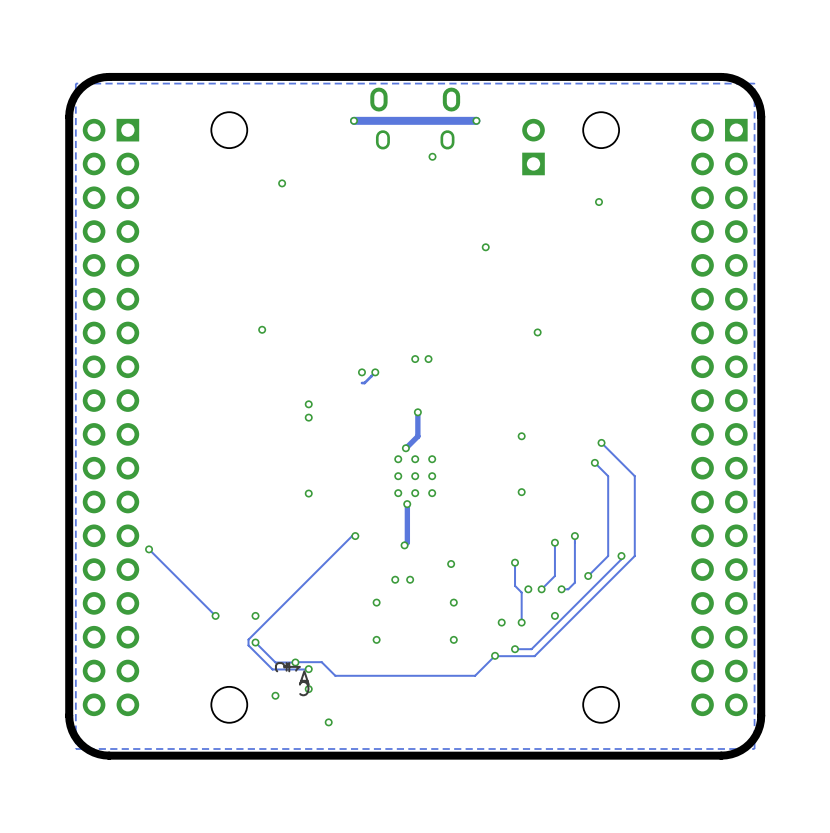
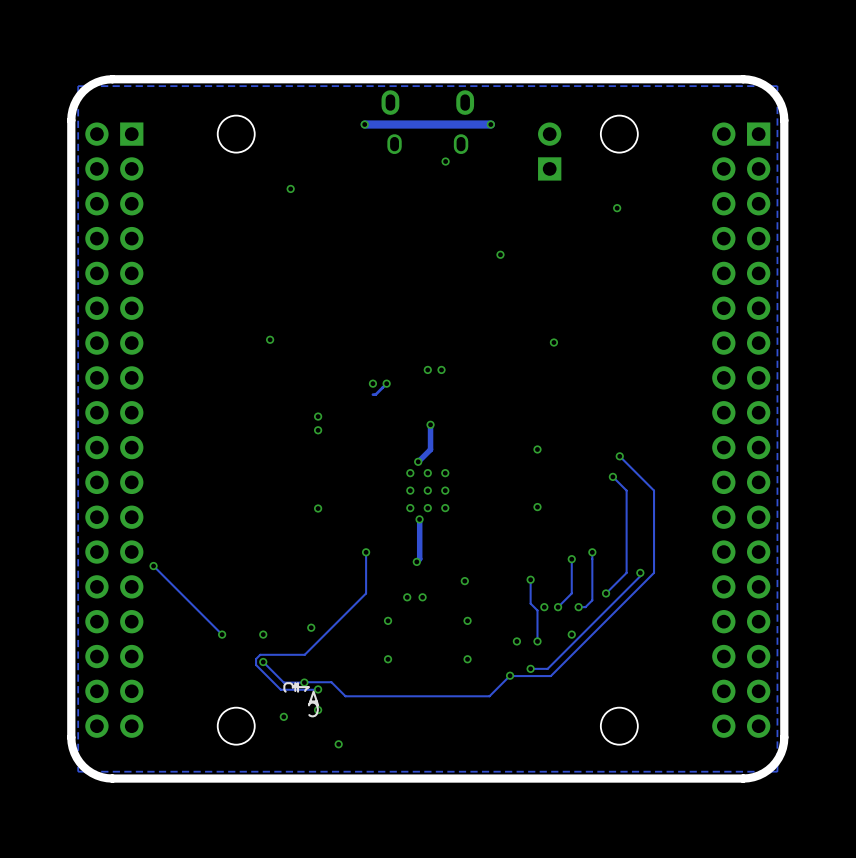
track: (355, 536) (352, 536) (252, 635) -> (366, 552) (366, 593) (304, 654) (260, 654)
via: none -> (311, 627)

